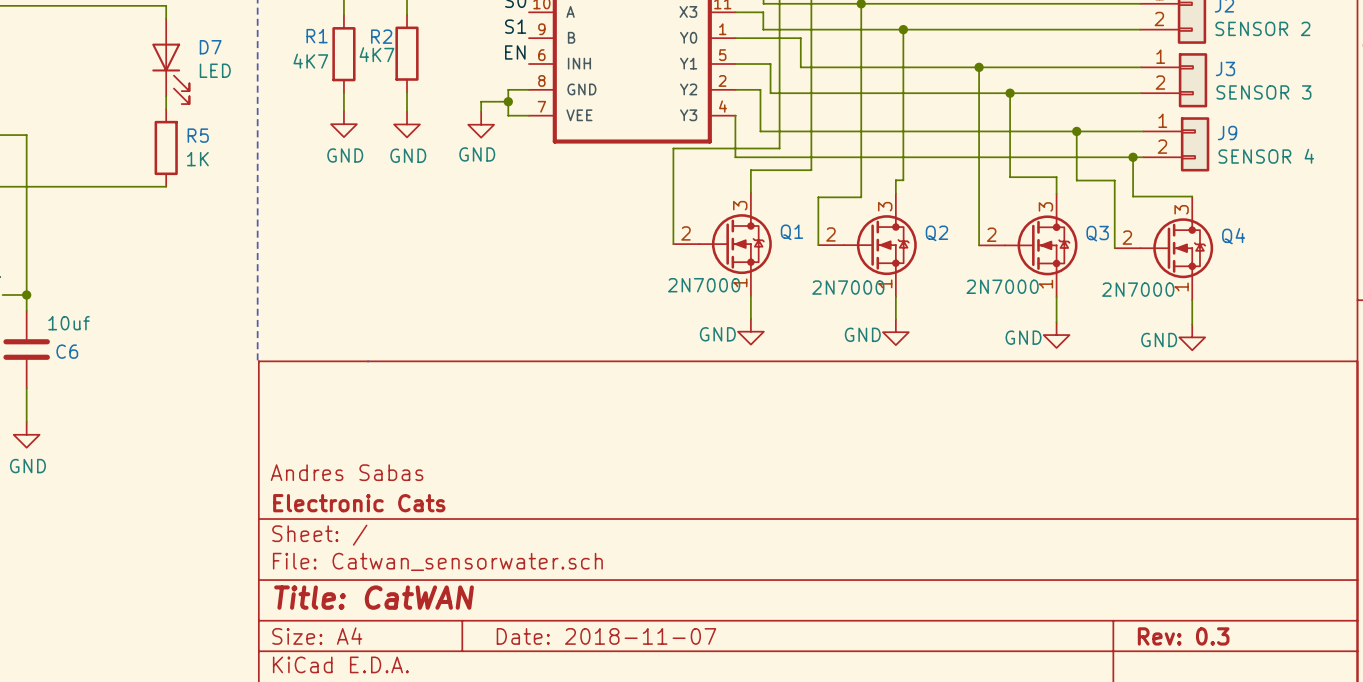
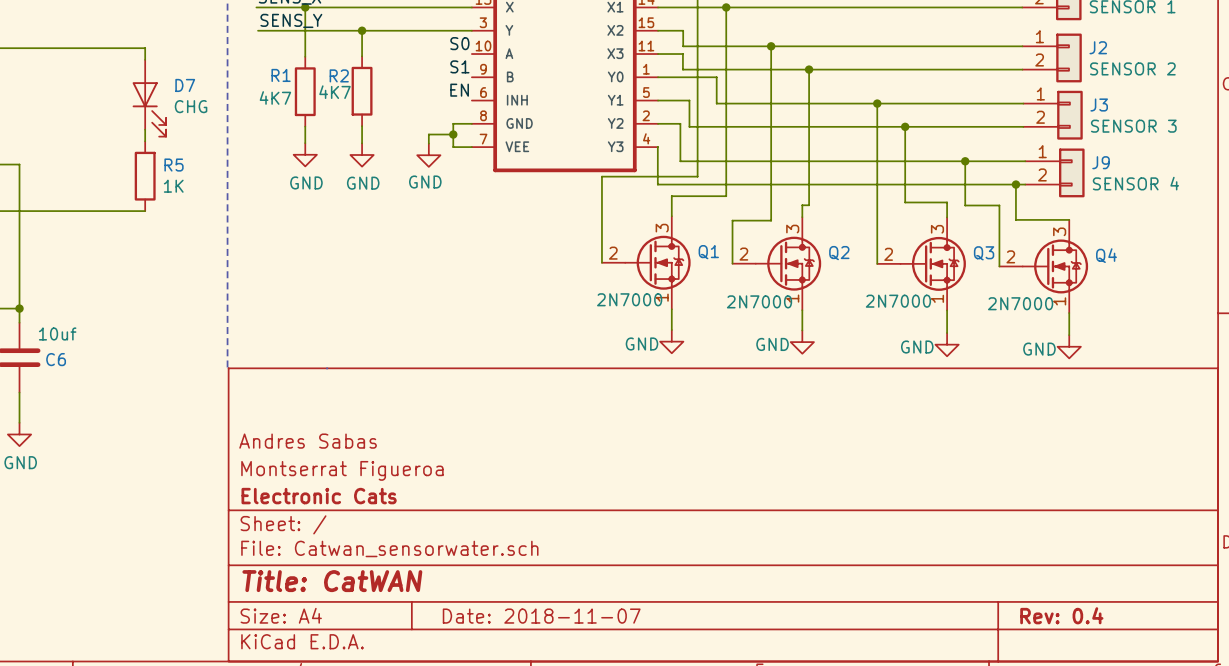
D7 value: LED (215, 70) -> CHG (191, 106)
title block: none -> Andres Sabas (308, 441)
title block: Andres Sabas (347, 472) -> Montserrat Figueroa (342, 470)
title block: Rev: 0.3 (1183, 636) -> Rev: 0.4 (1061, 615)

